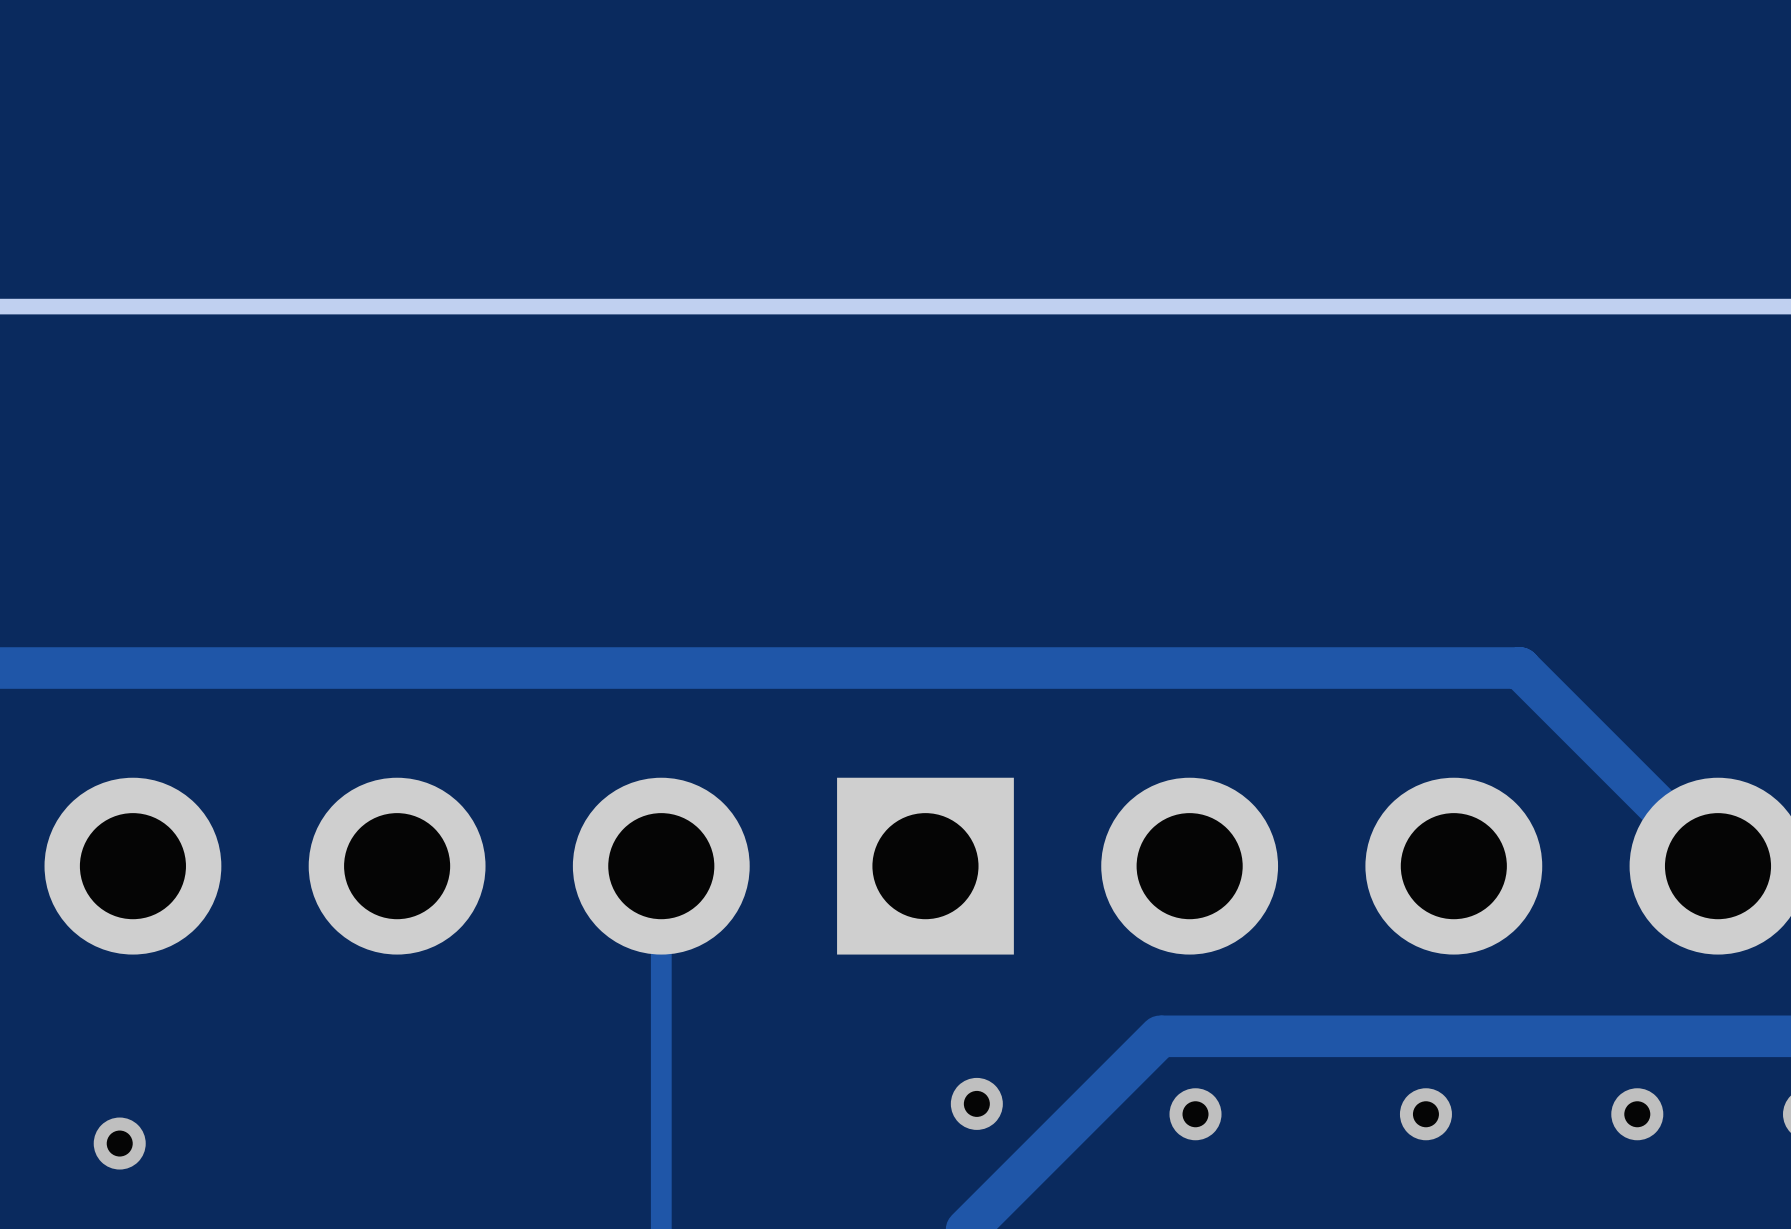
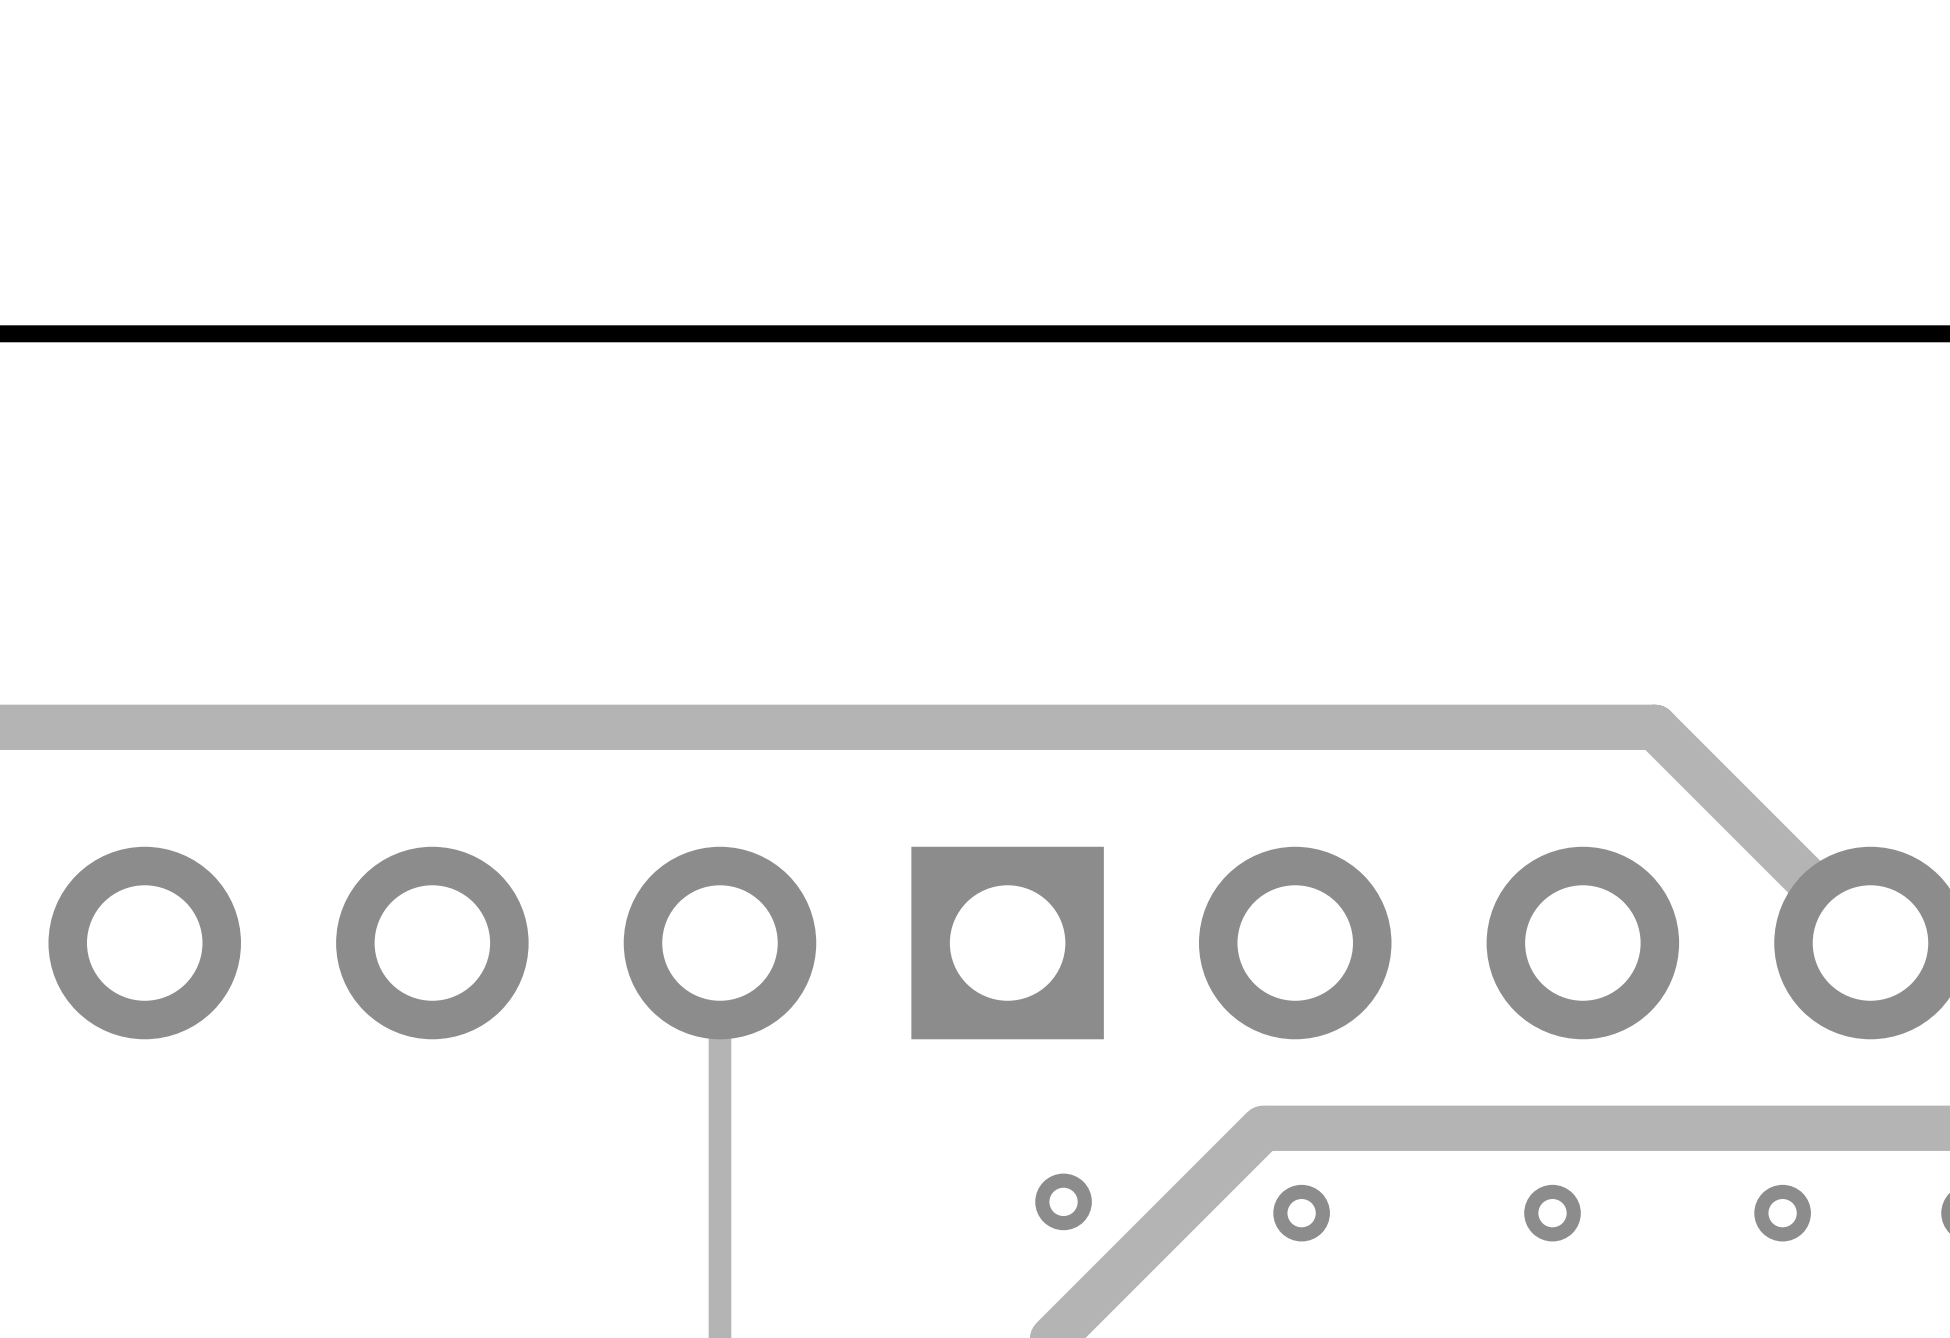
via: (119, 1143) -> none

